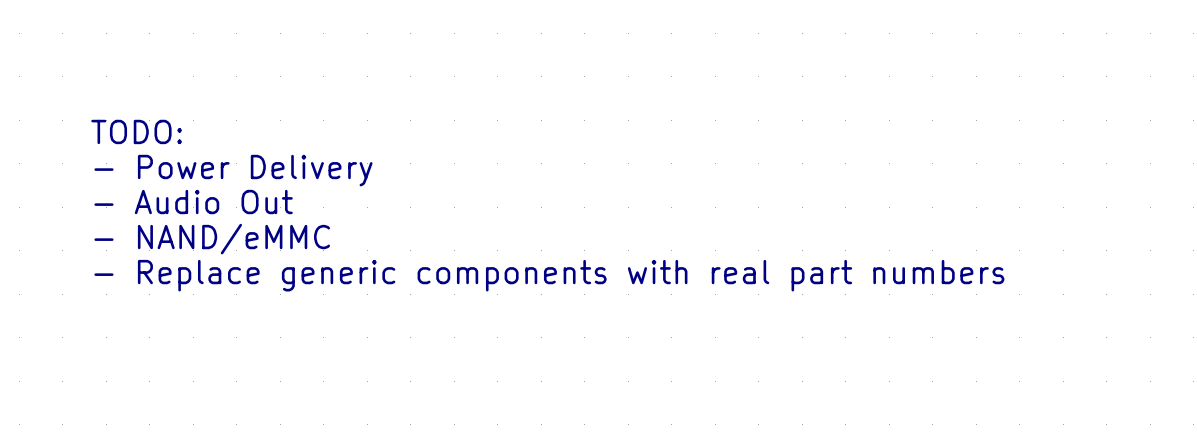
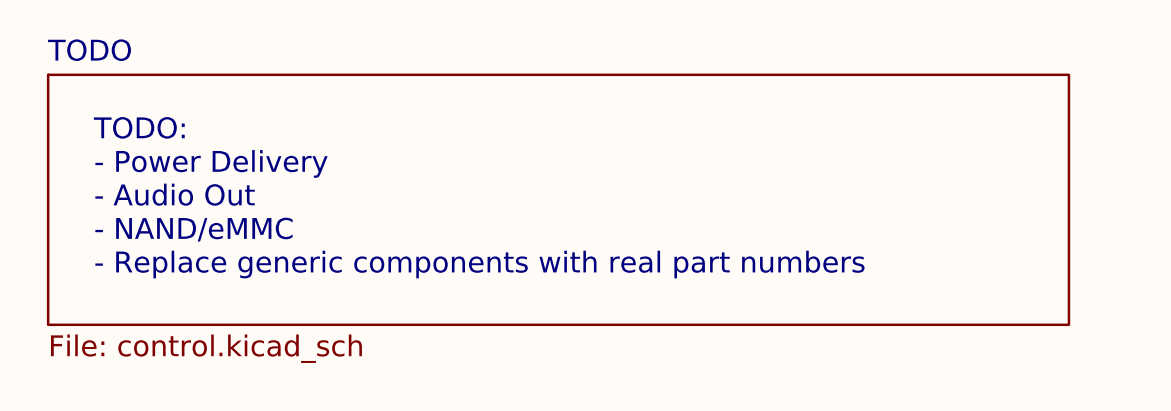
sheet TODO: none -> File: control.kicad_sch (558, 199)

